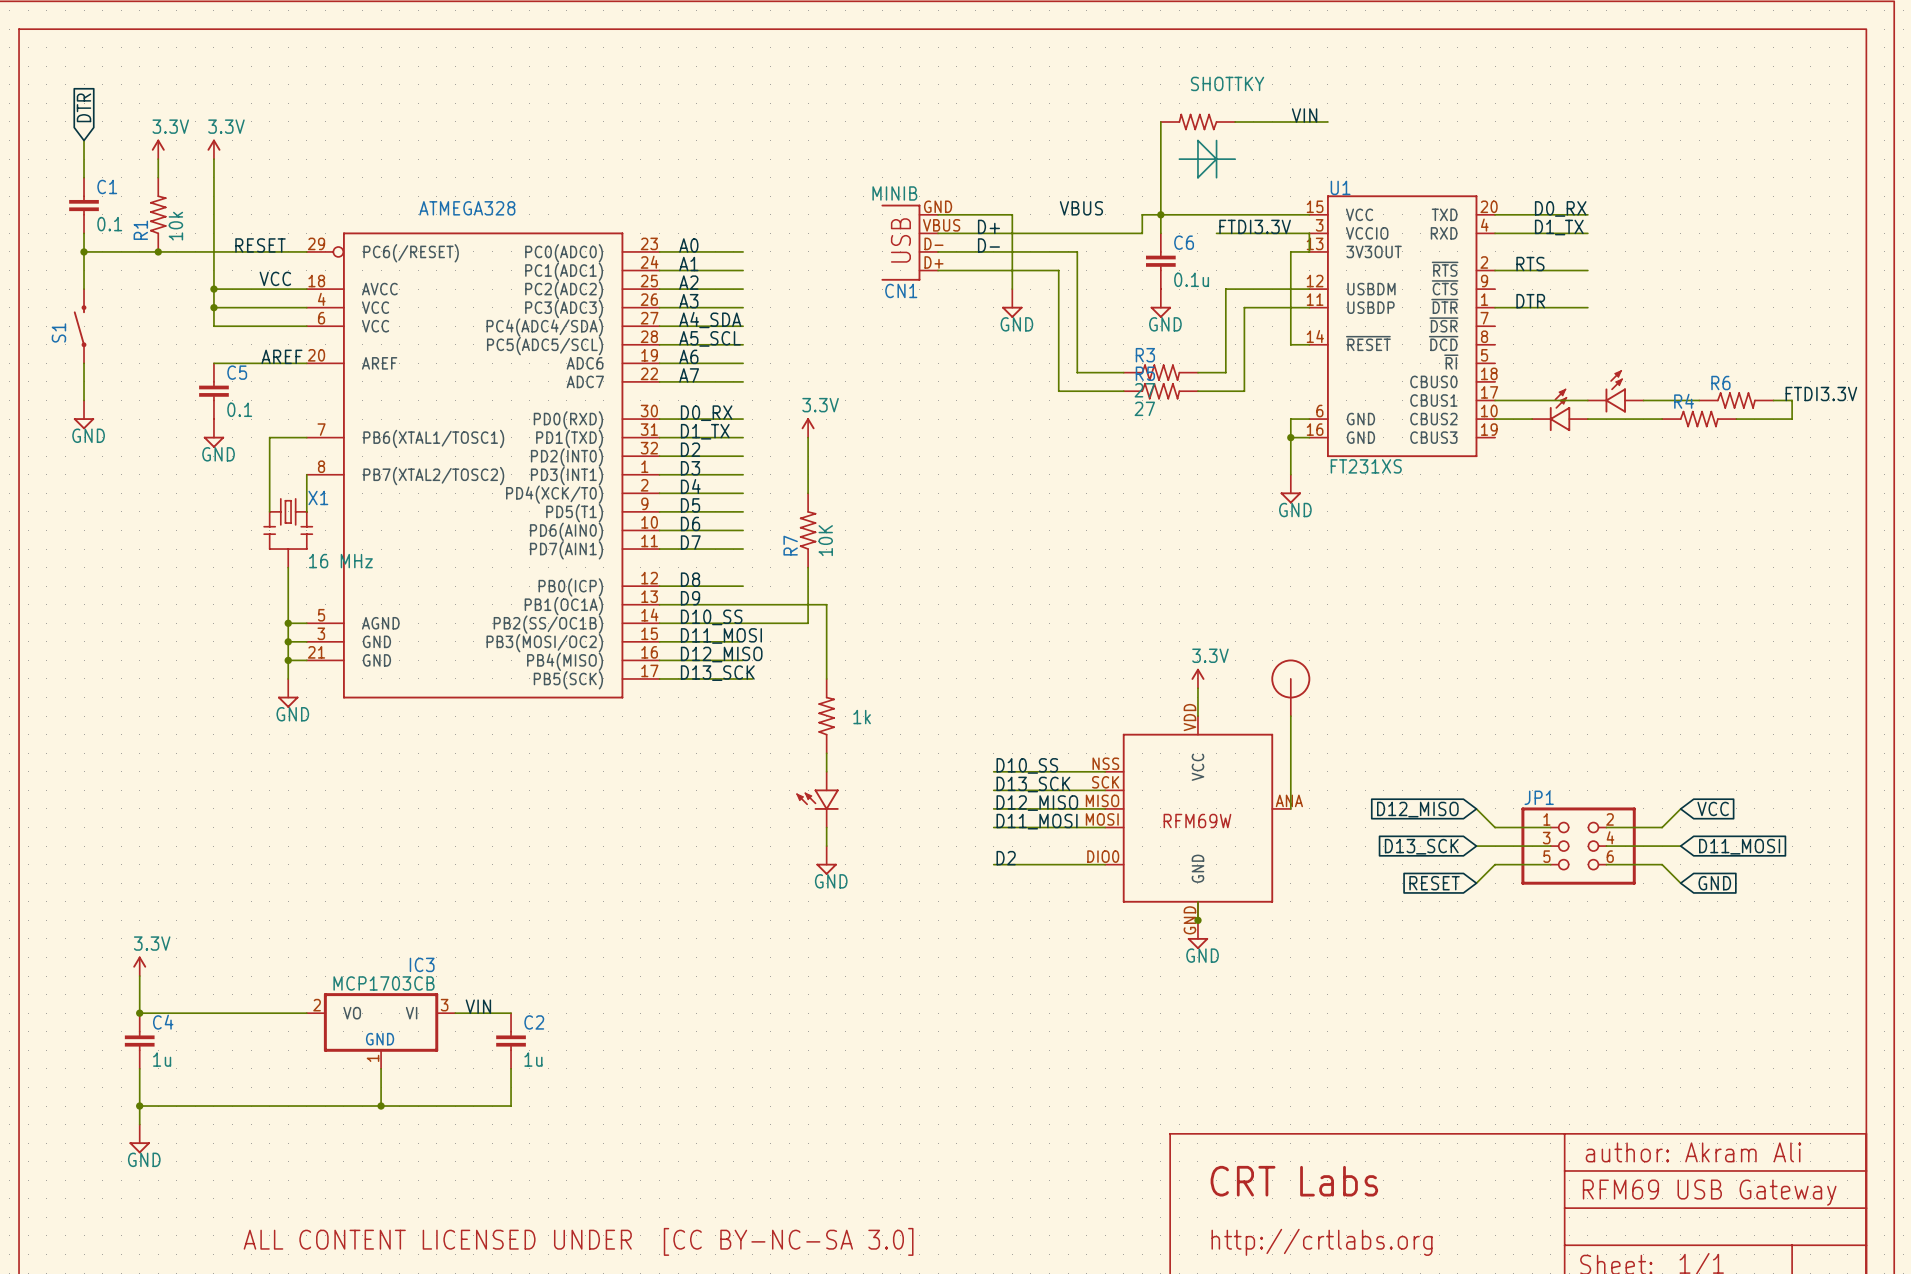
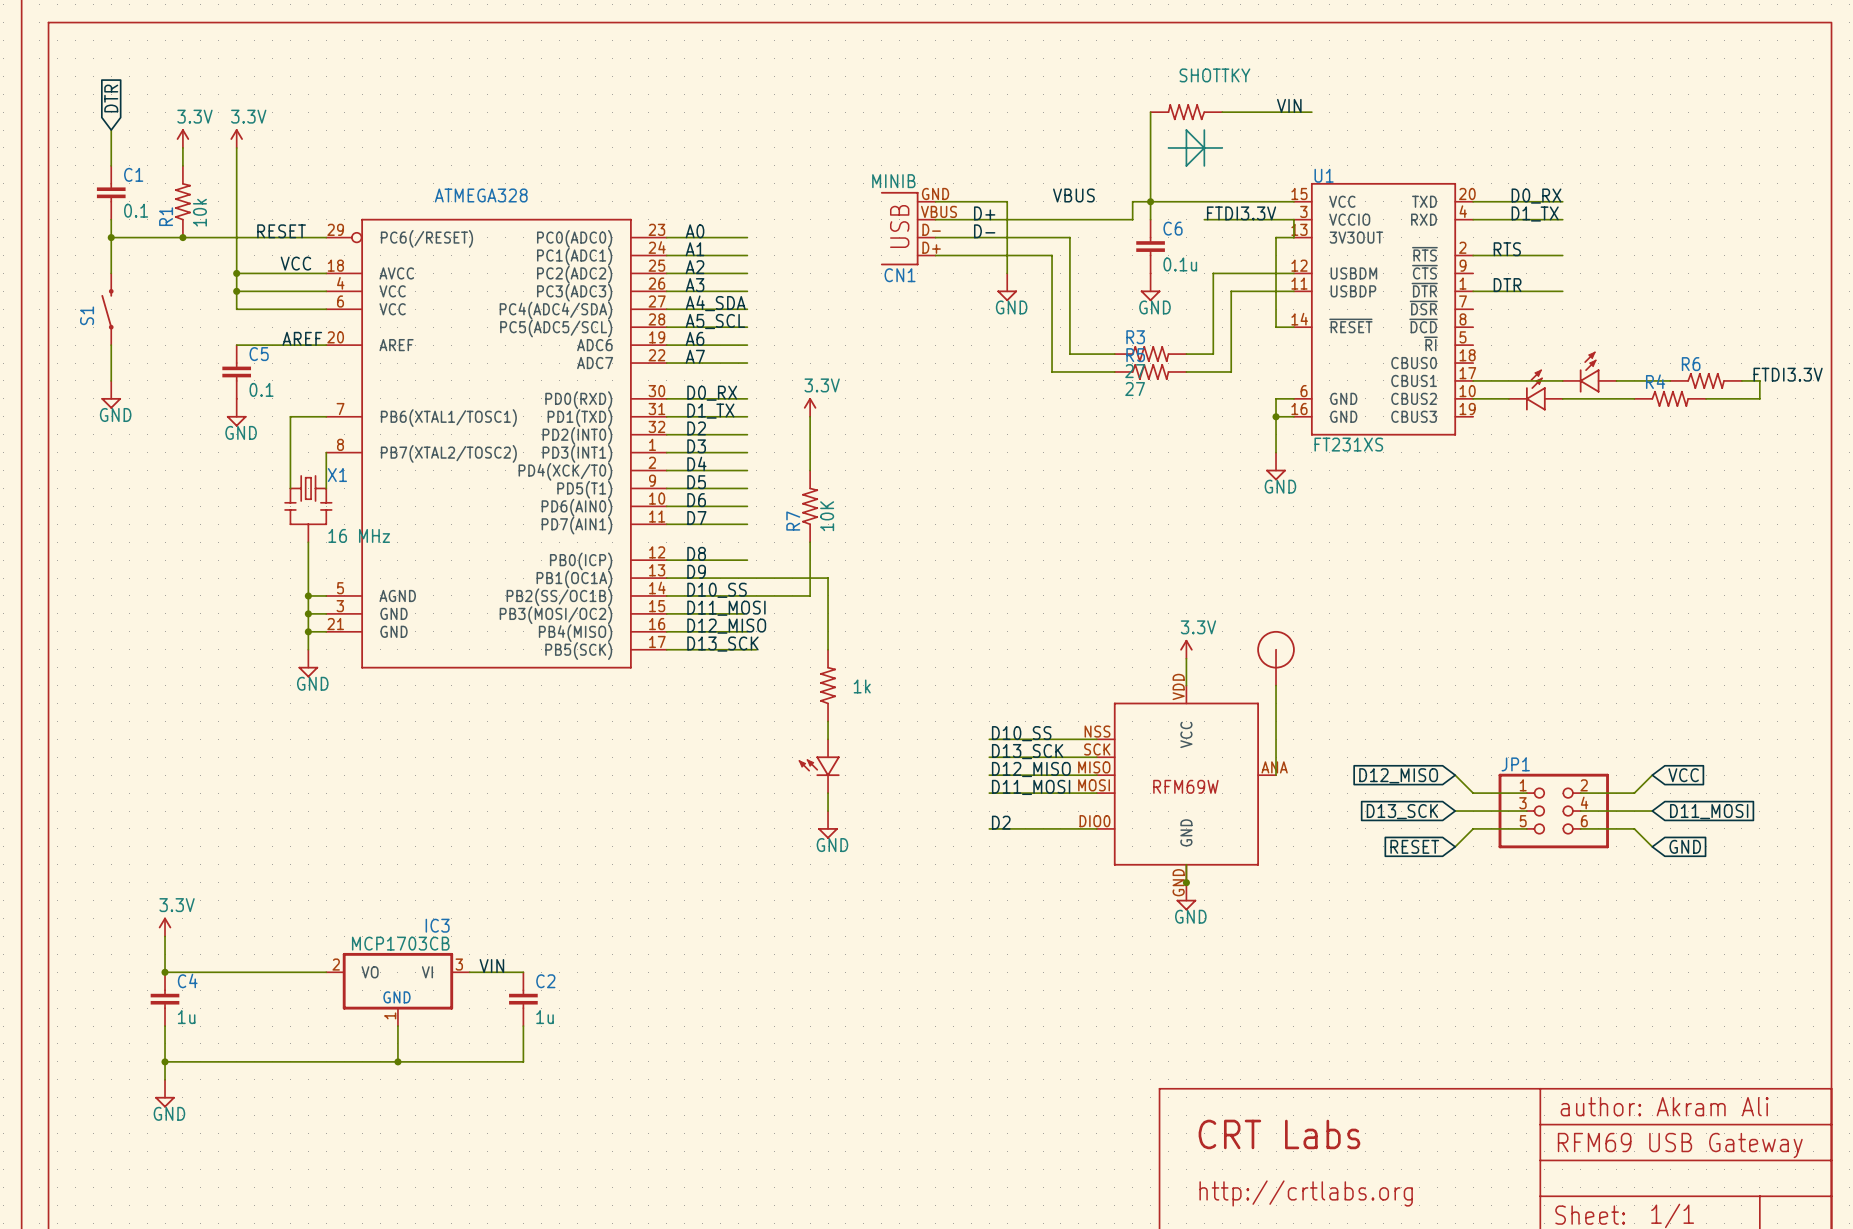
text: ALL CONTENT LICENSED UNDER [CC BY-NC-SA 3.0] (578, 1241) -> none

